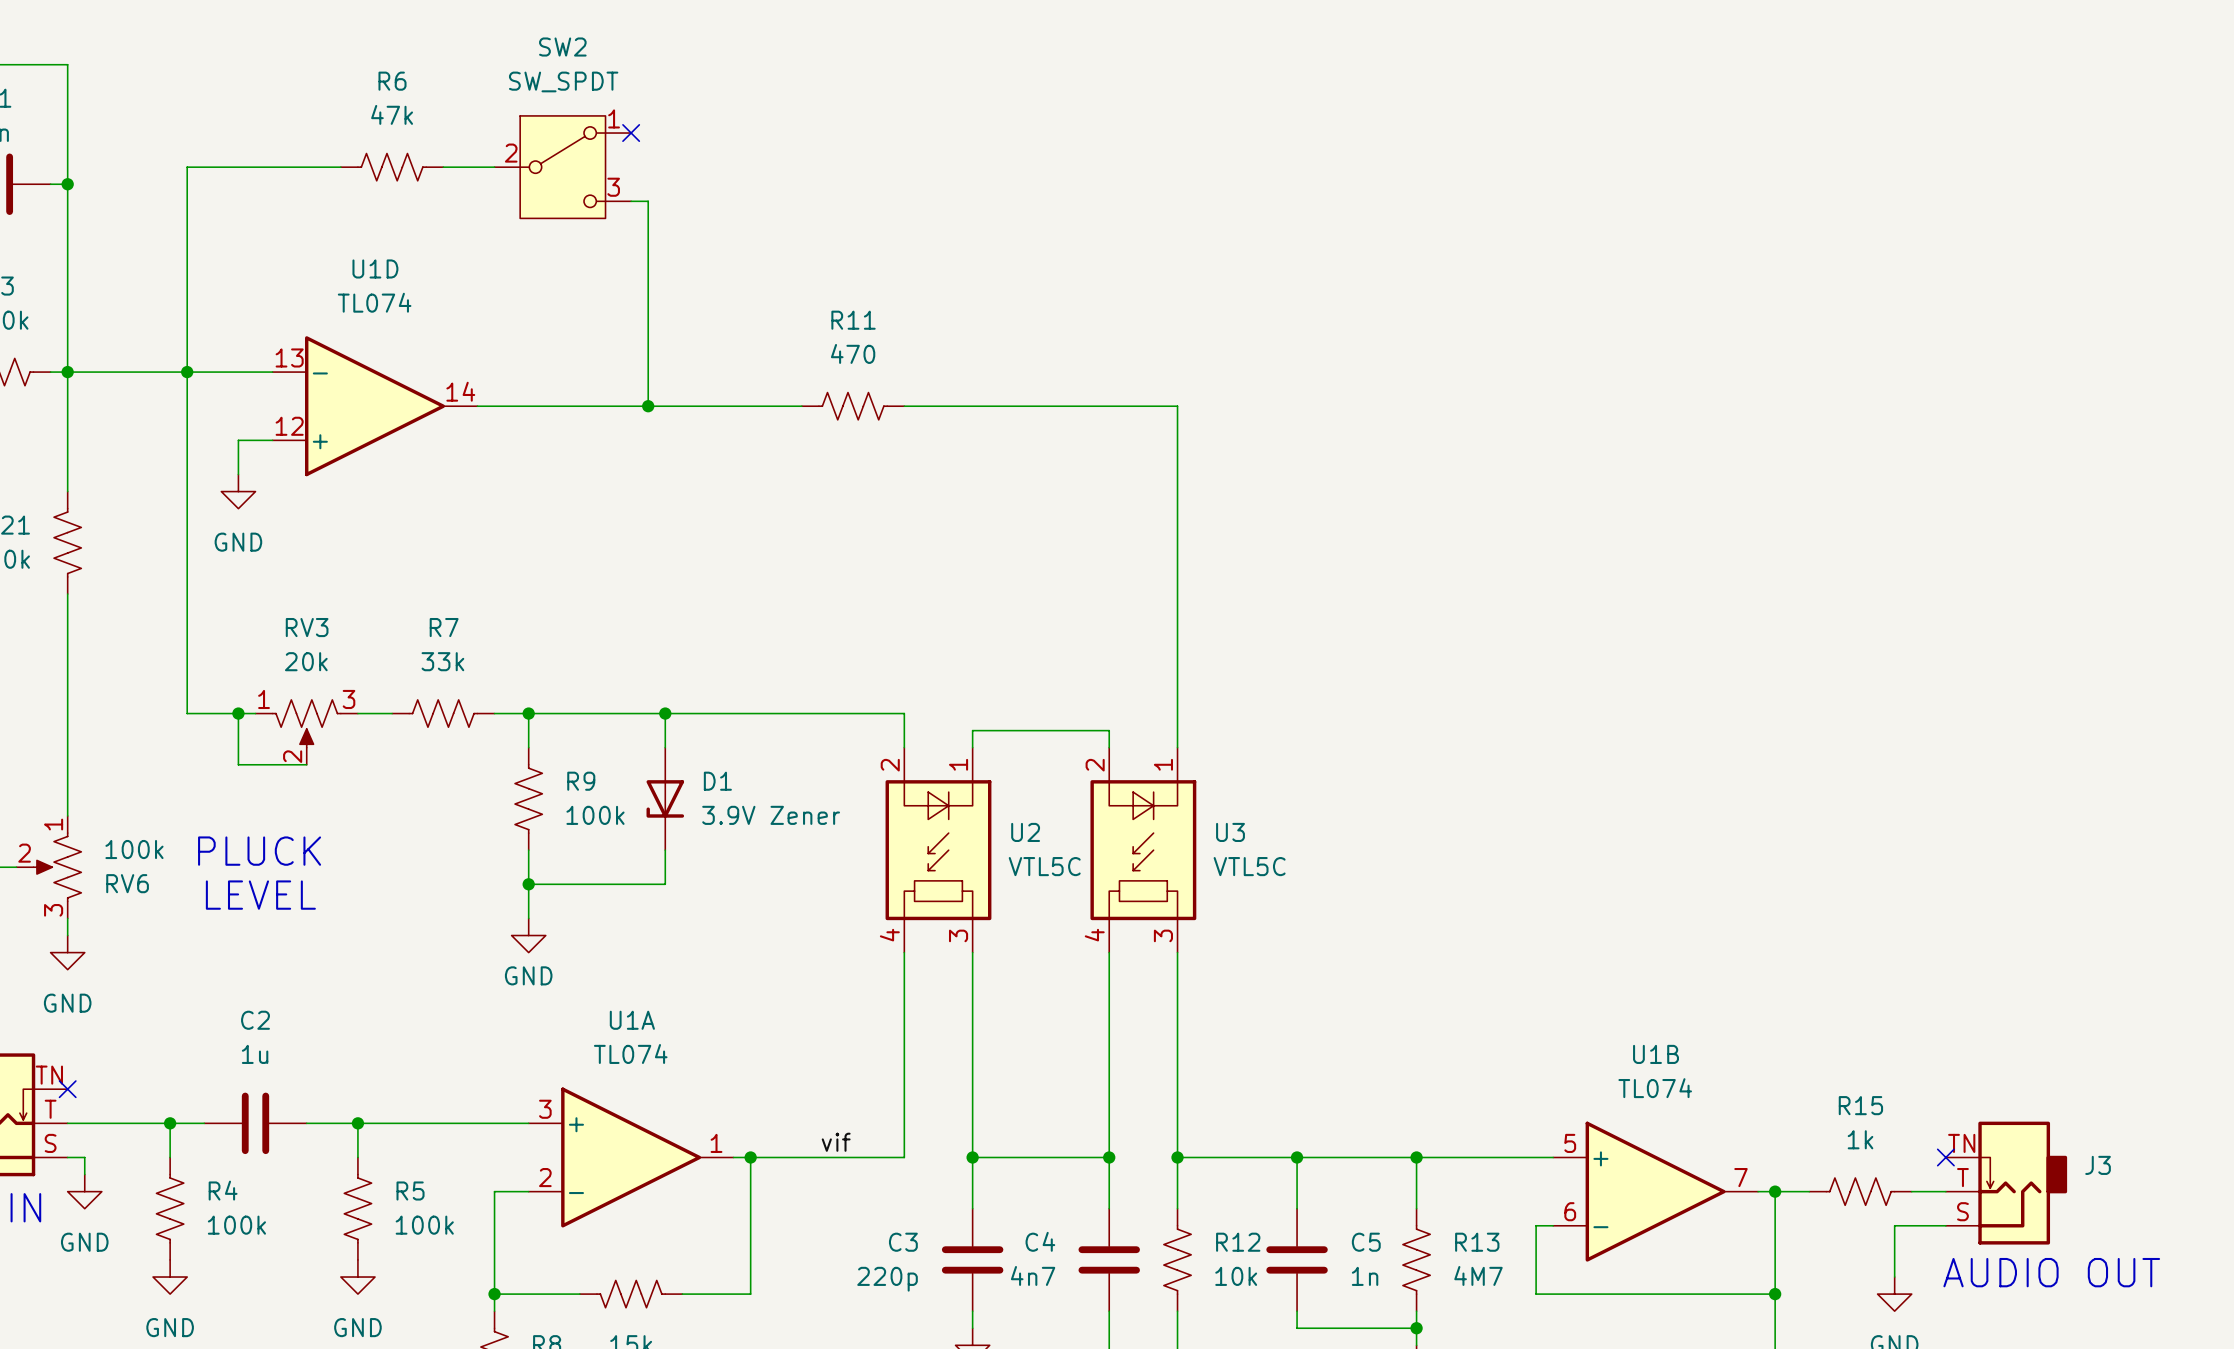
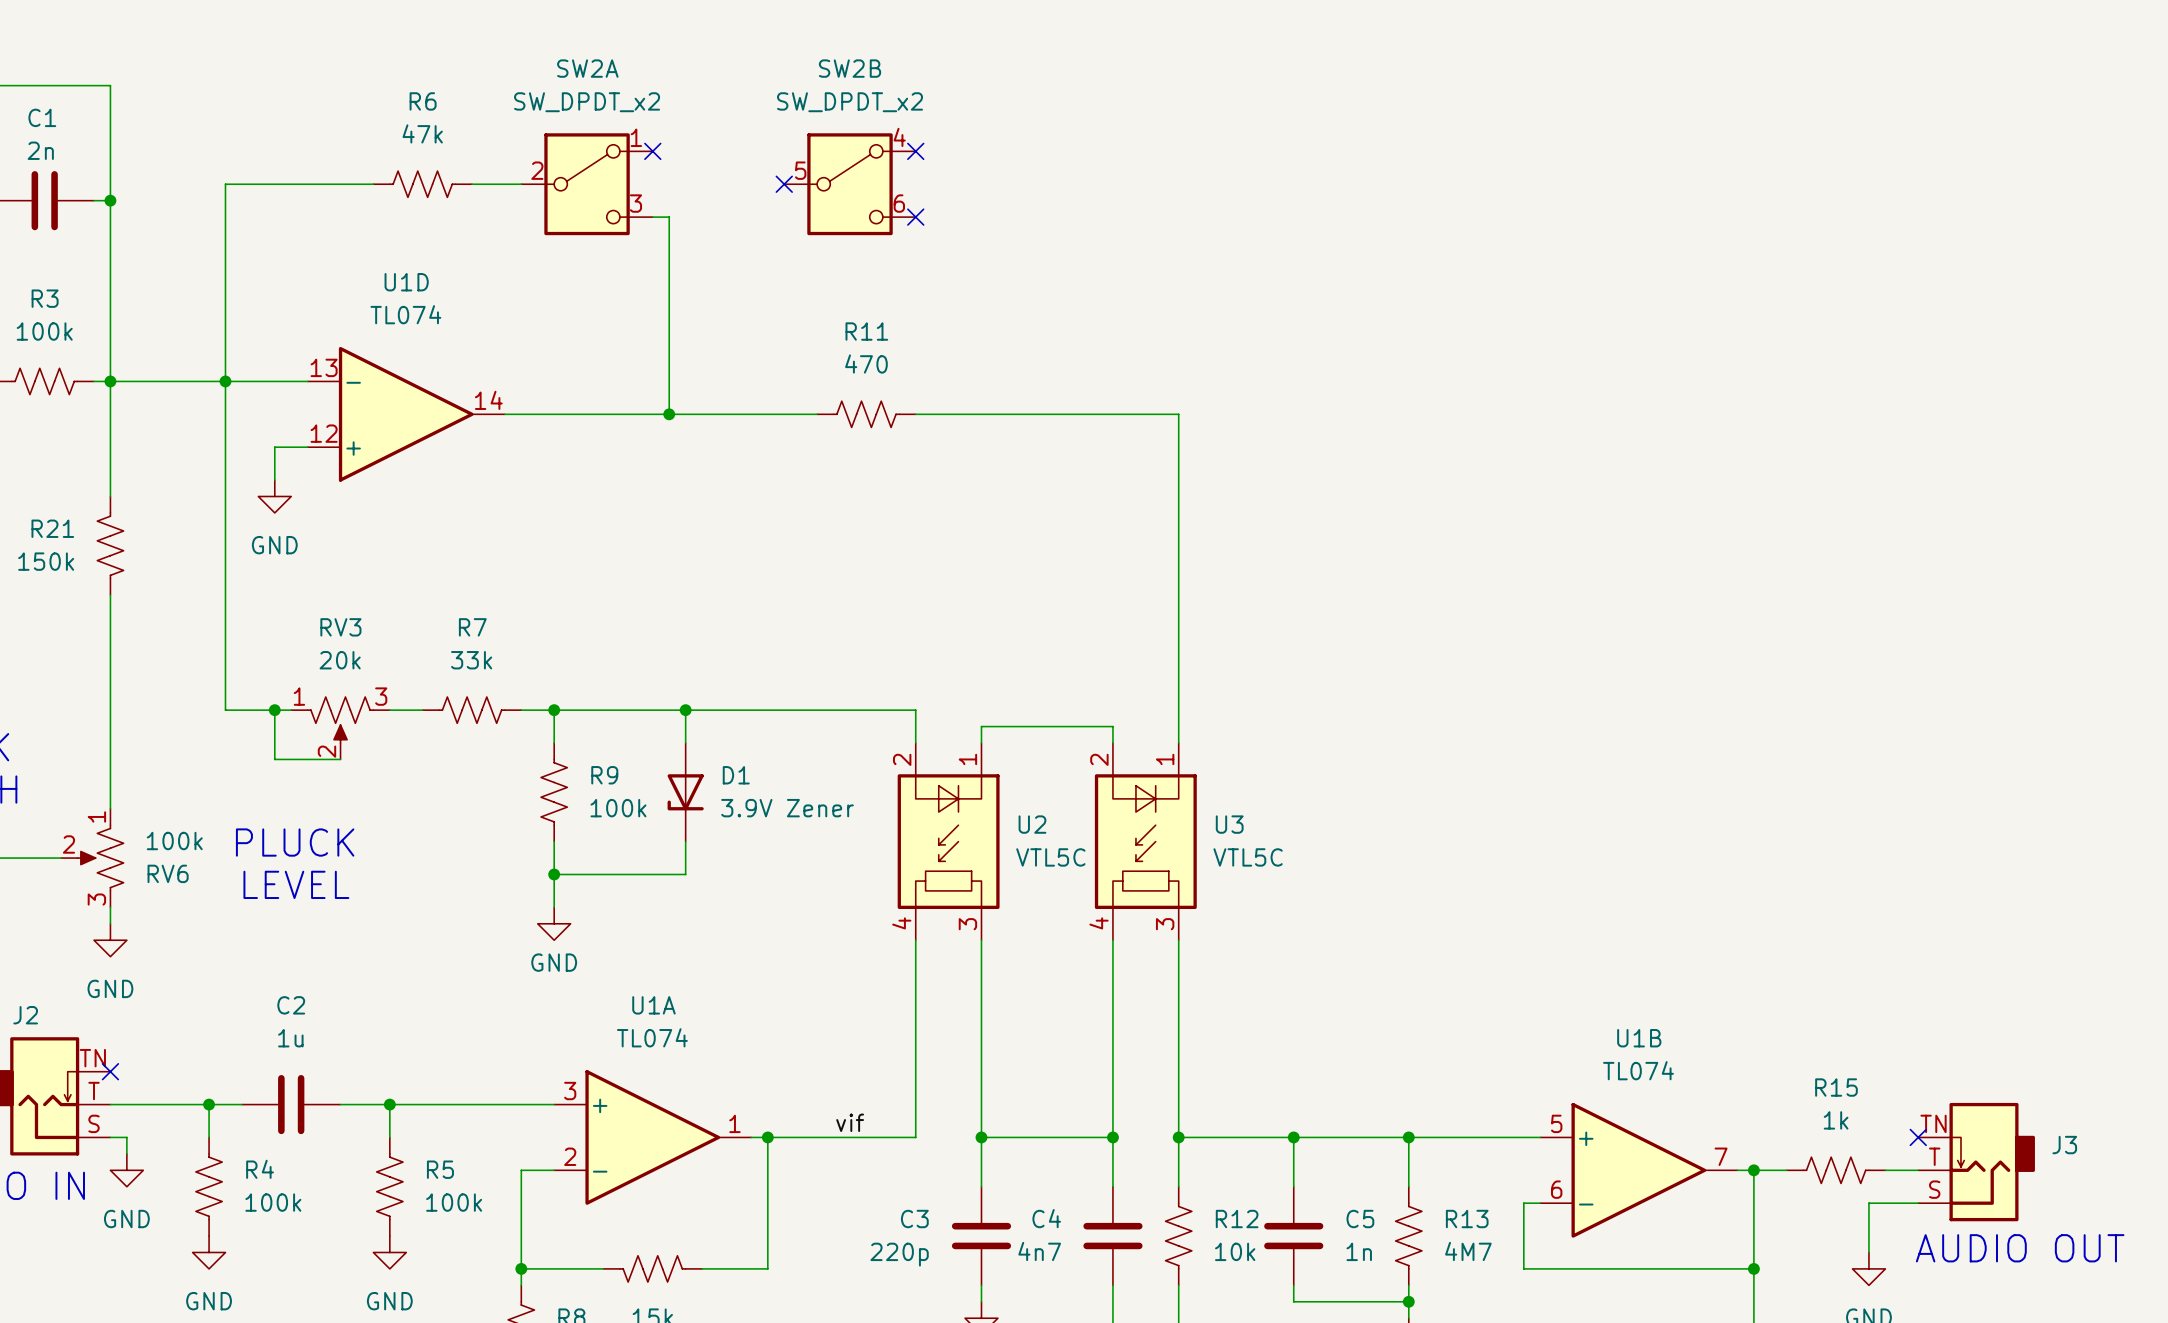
no-connect mark: none -> (915, 151)
SW2: SW_SPDT (562, 167) -> none
SW2A: none -> SW_DPDT_x2 (587, 184)
no-connect mark: none -> (784, 184)
SW2B: none -> SW_DPDT_x2 (850, 184)
no-connect mark: none -> (915, 217)

